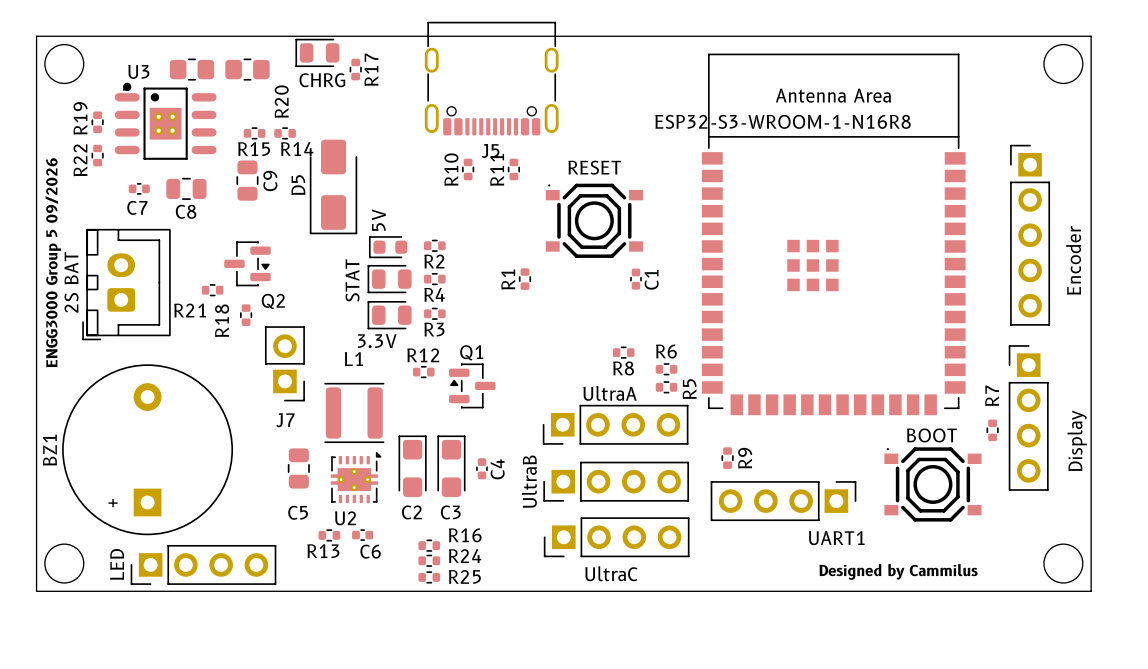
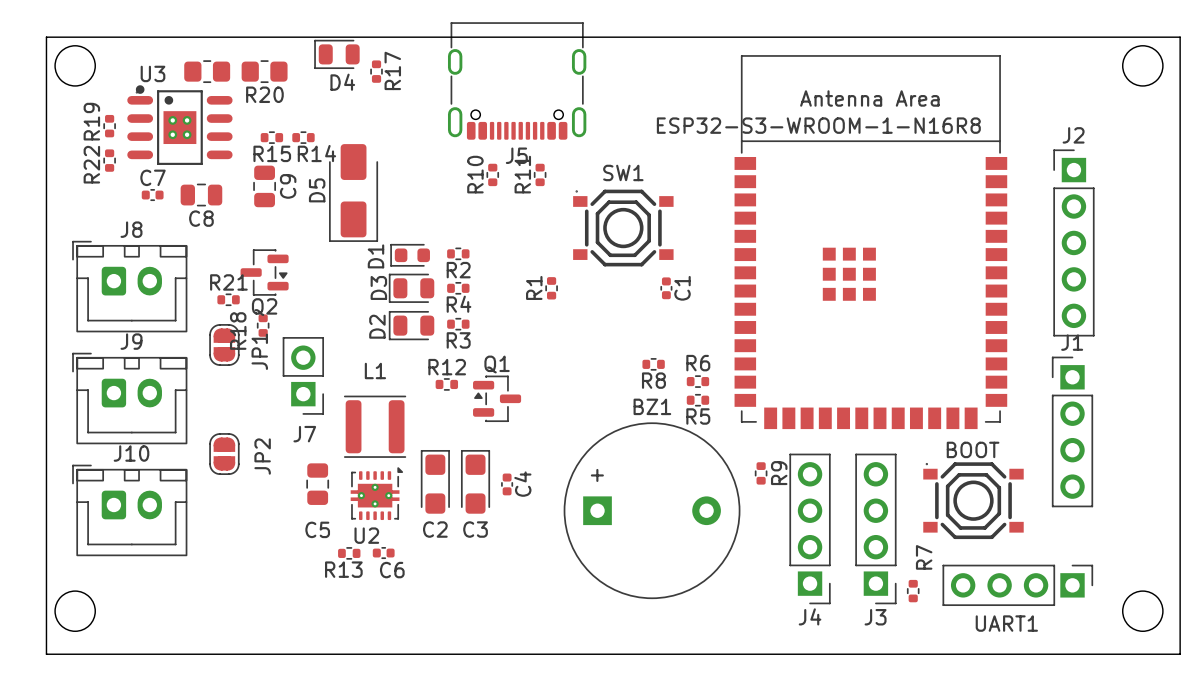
board edge: (1091, 36) (1091, 591) (36, 591) -> (1137, 37) (1180, 37) (1180, 654) (46, 654) (46, 611)
round board edge position: (1063, 64) -> (1142, 65)
CHRG name: CHRG (322, 80) -> D4 (342, 82)
R20 name rotation: 0° (281, 101) -> 90° clockwise (264, 94)
RESET name: RESET (594, 167) -> SW1 (623, 172)
C7 name position: C7 (137, 207) -> C7 (153, 177)
5V name: 5V (378, 220) -> D1 (375, 256)
Encoder name: Encoder (1073, 260) -> J2 (1073, 135)
text: ENGG3000 Group 5 09/2026 (53, 262) -> none
J8: none -> (129, 286)
STAT name: STAT (352, 280) -> D3 (378, 287)
2S BAT: (126, 284) -> none
Q2 name position: Q2 (273, 301) -> Q2 (264, 307)
R21 name position: R21 (190, 310) -> R21 (228, 282)
JP1: none -> (224, 344)
3.3V name: 3.3V (377, 341) -> D2 (377, 326)
J9: none -> (129, 398)
R5 name rotation: 0° (689, 389) -> 90° clockwise (698, 416)
R7 name position: R7 (992, 395) -> R7 (924, 557)
UltraA: (615, 424) -> none
R7 position: (992, 430) -> (913, 591)
JP2: none -> (224, 454)
Display name: Display (1077, 440) -> J1 (1072, 342)
BZ1 rotation: 0° (147, 449) -> 90° clockwise (652, 510)
BZ1 position: (147, 449) -> (652, 510)
UltraB: (616, 481) -> none
J10: none -> (129, 510)
UART1 position: (783, 501) -> (1017, 585)
J4: none -> (810, 528)
J3: none -> (875, 528)
UltraC: (616, 537) -> none
UART1 name position: UART1 (836, 538) -> UART1 (1006, 623)
R16: (429, 545) -> none
R24: (429, 560) -> none
round board edge position: (64, 563) -> (75, 611)
round board edge position: (1063, 563) -> (1142, 611)
LED: (203, 564) -> none
text: Designed by Cammilus (898, 571) -> none
R25: (429, 577) -> none

